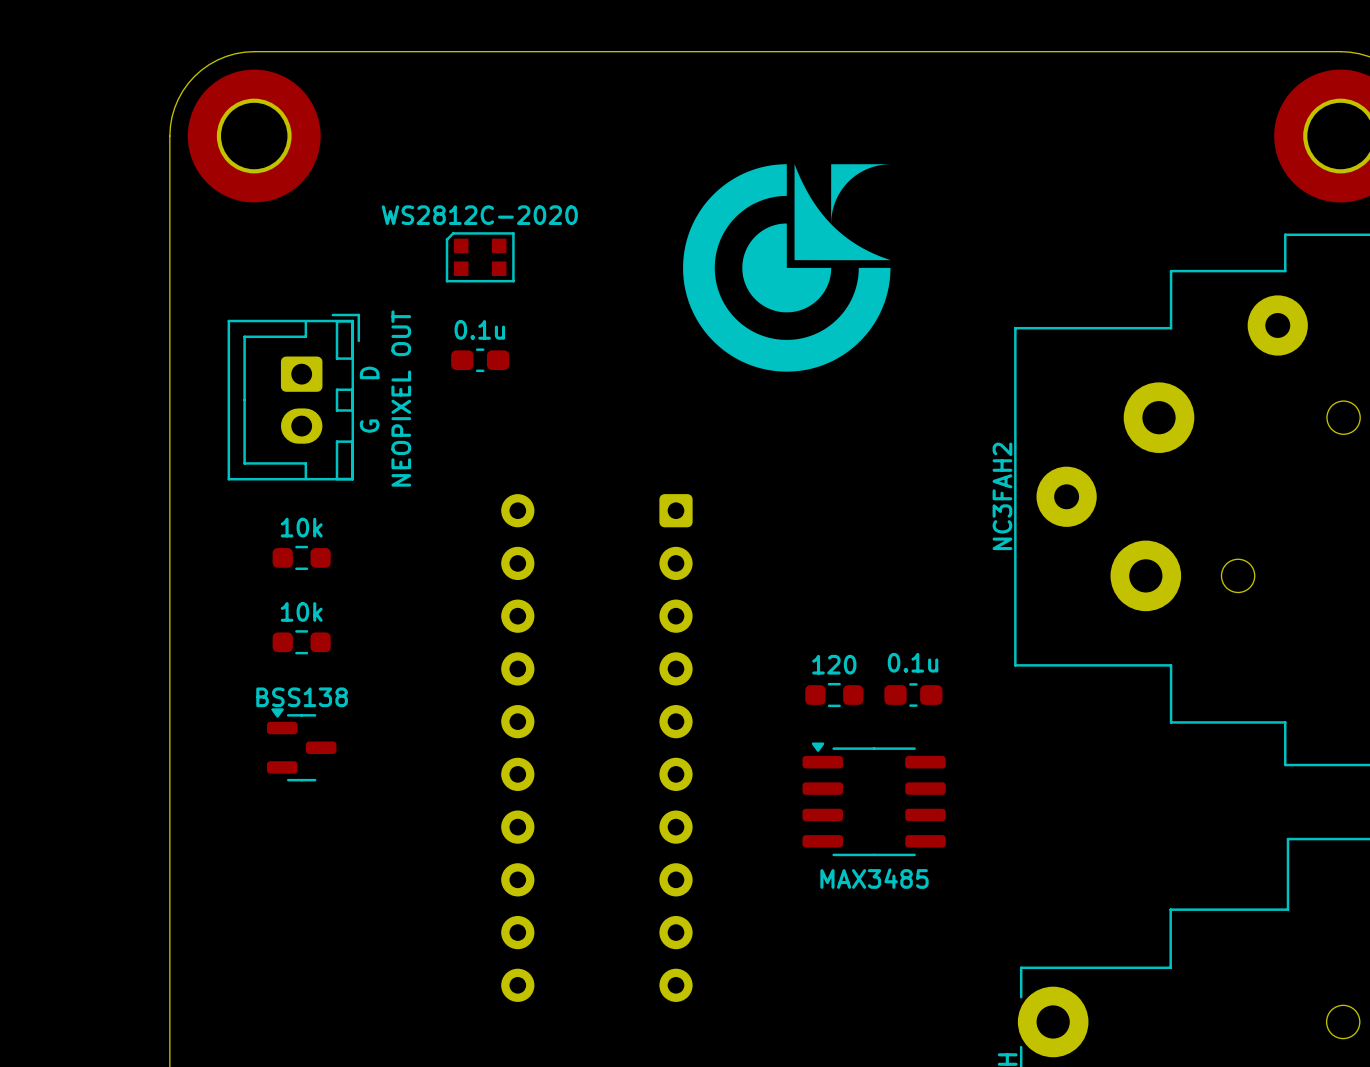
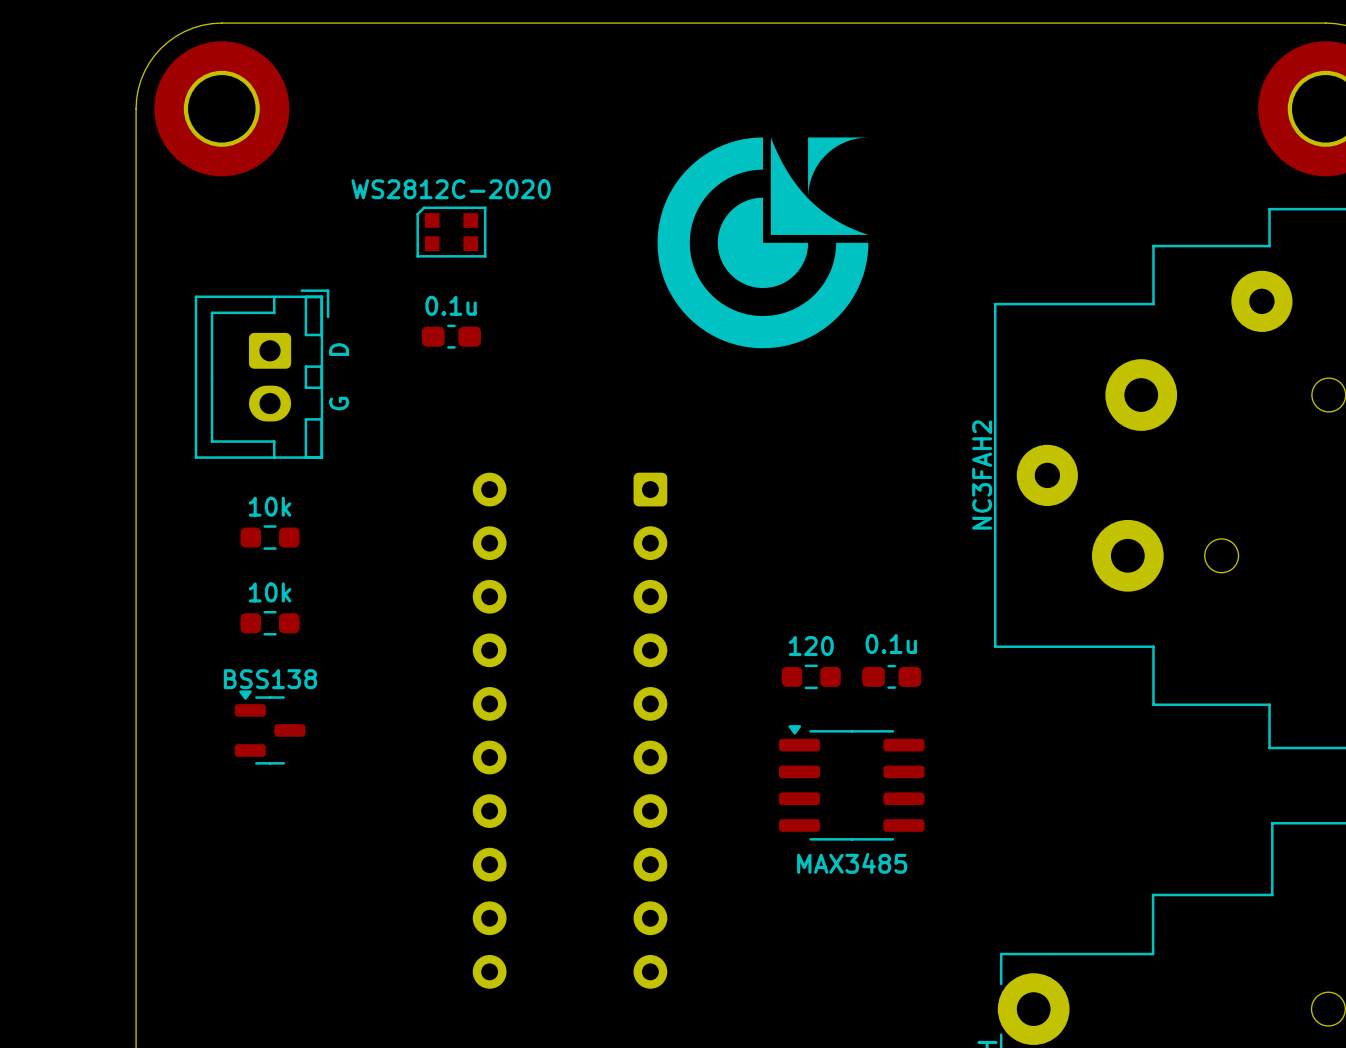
NEOPIXEL OUT name: NEOPIXEL OUT (401, 398) -> none

